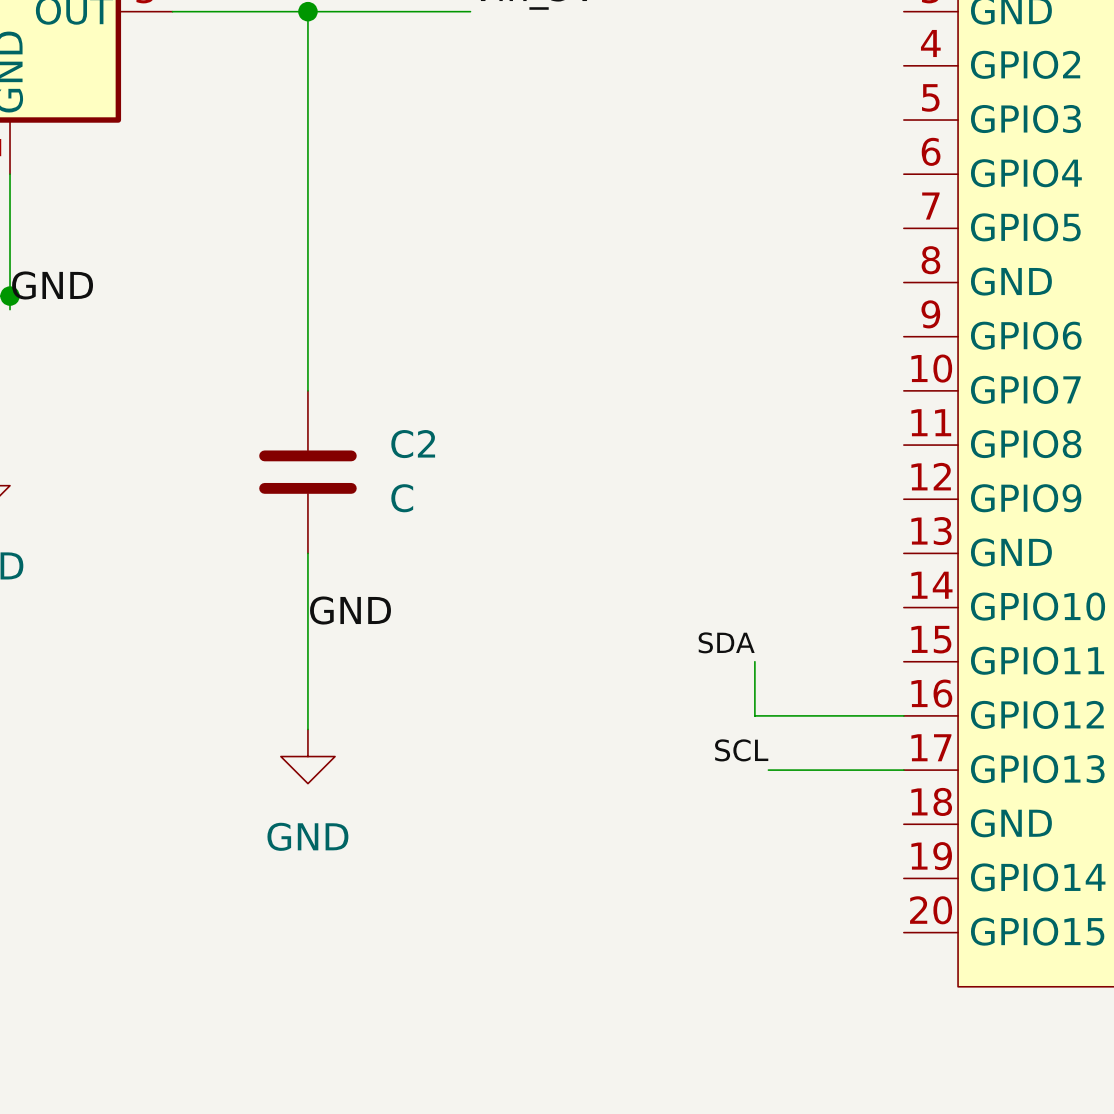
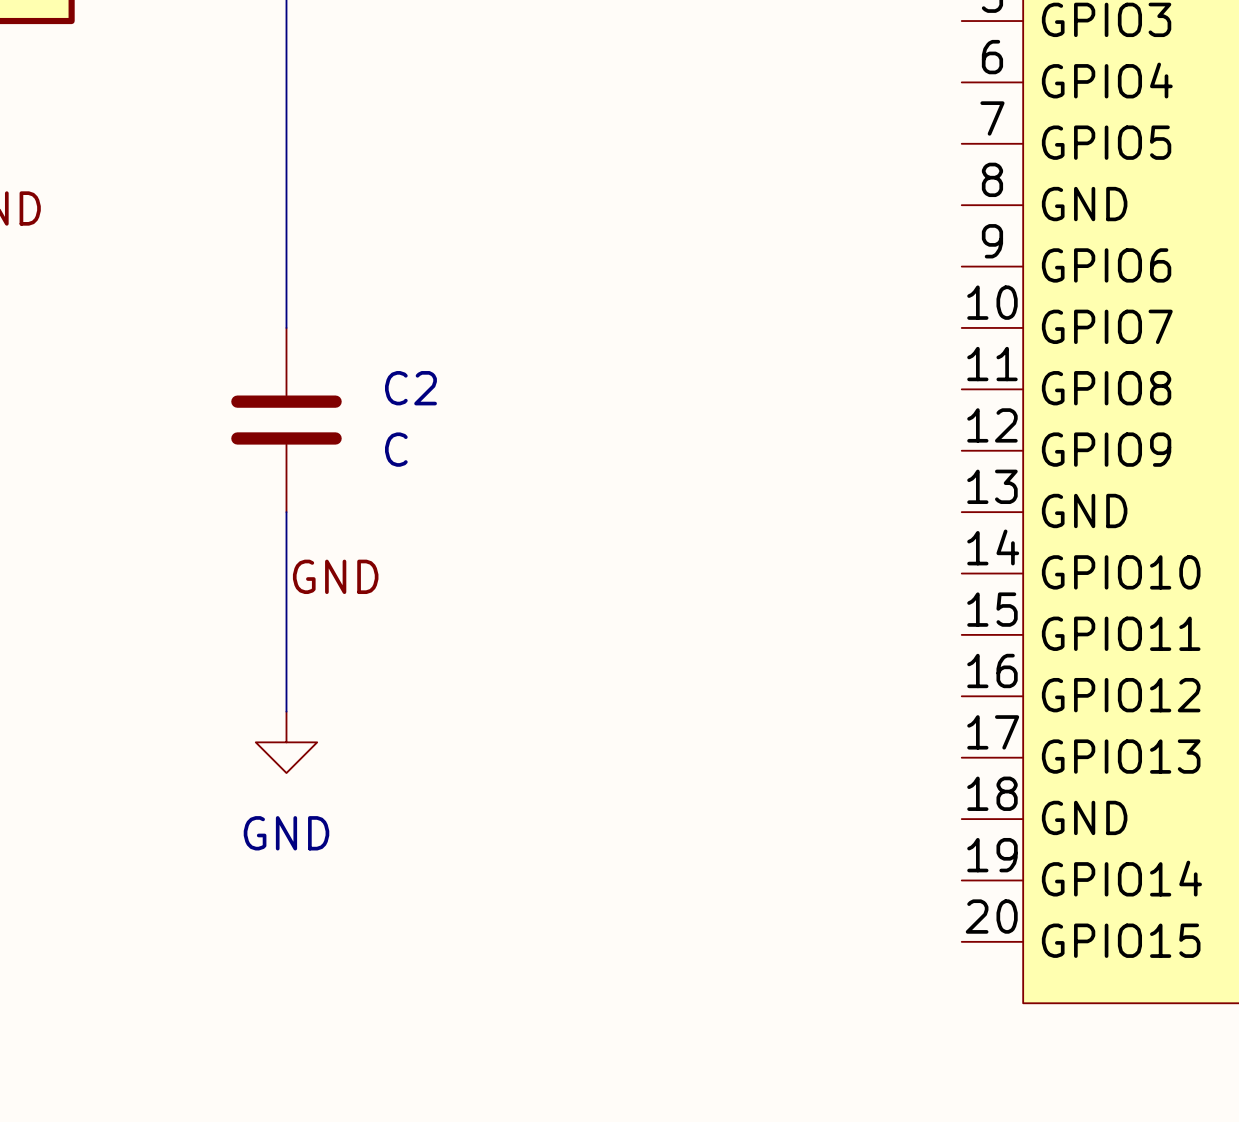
label: SDA (726, 642) -> none
wire: (754, 661) (754, 715) (903, 715) -> none
label: SCL (741, 750) -> none
wire: (768, 770) (903, 770) -> none

